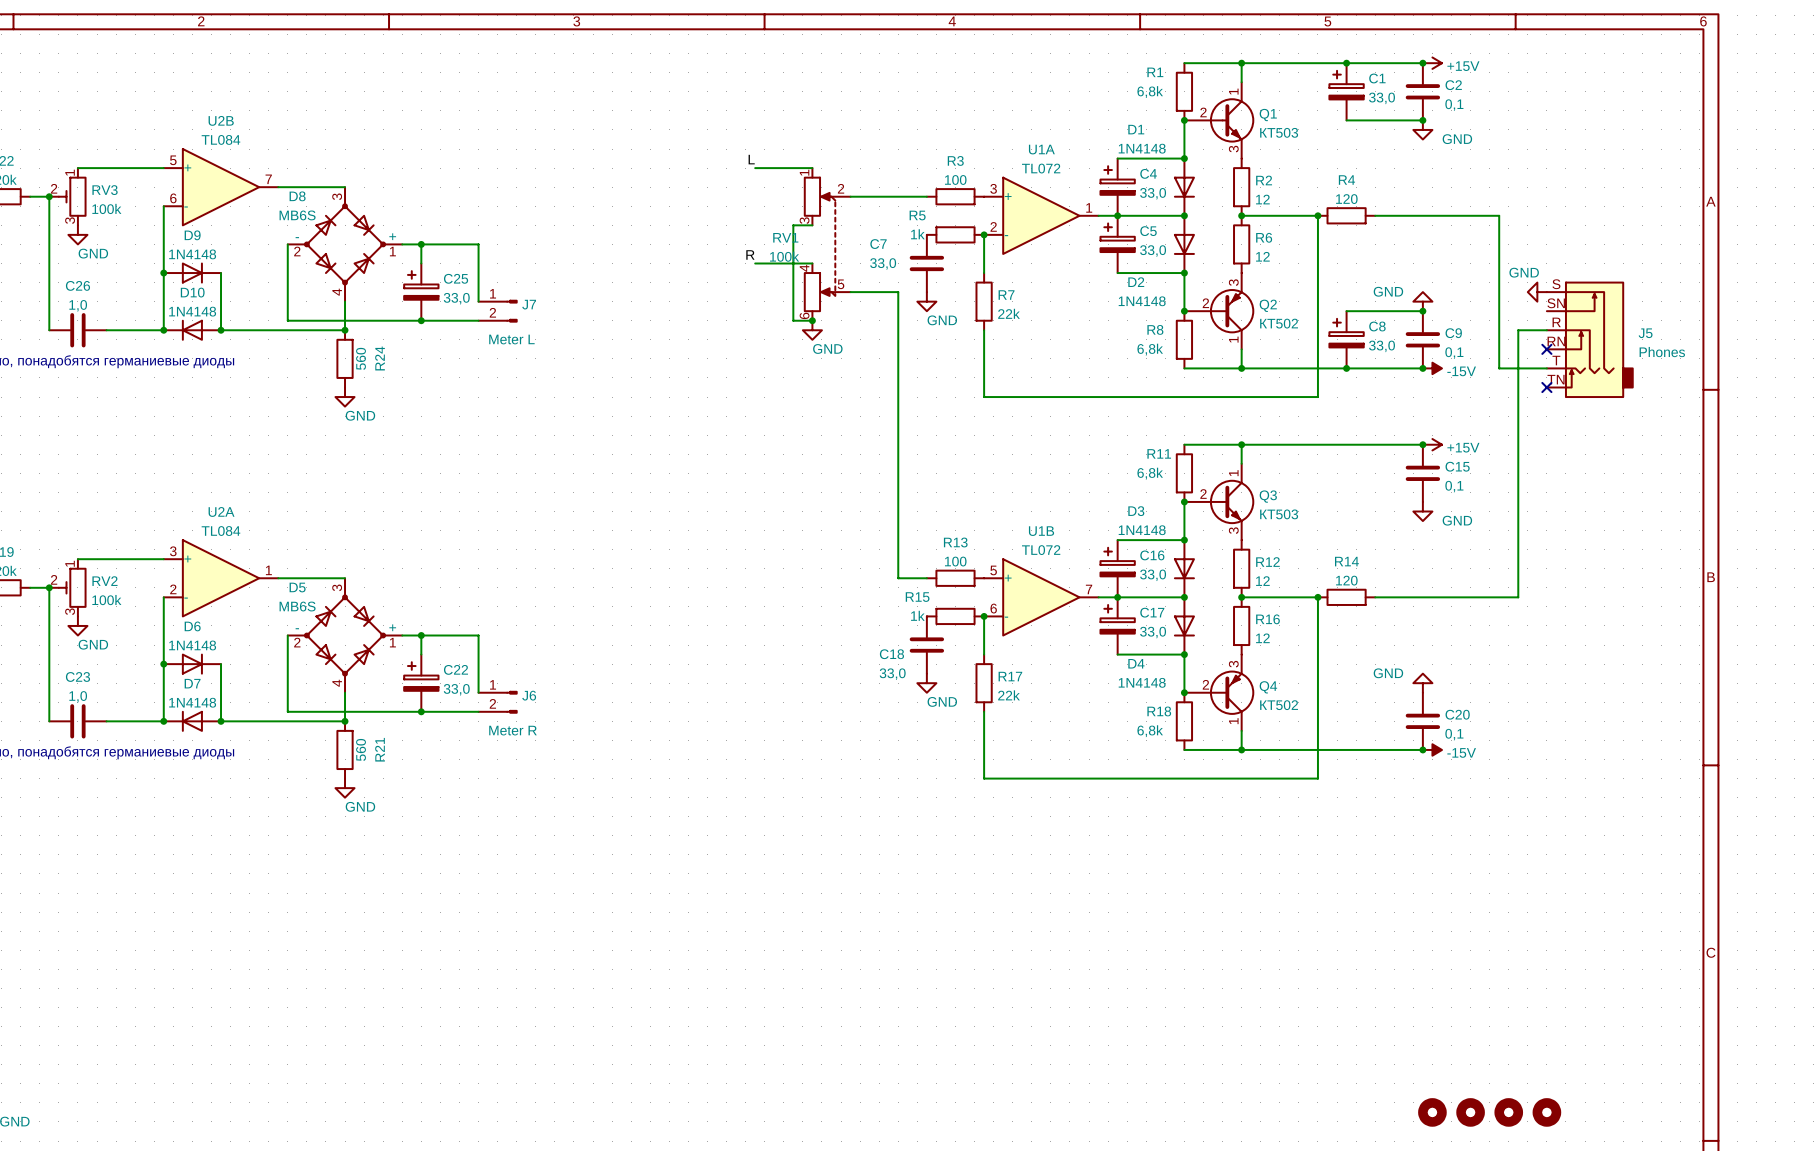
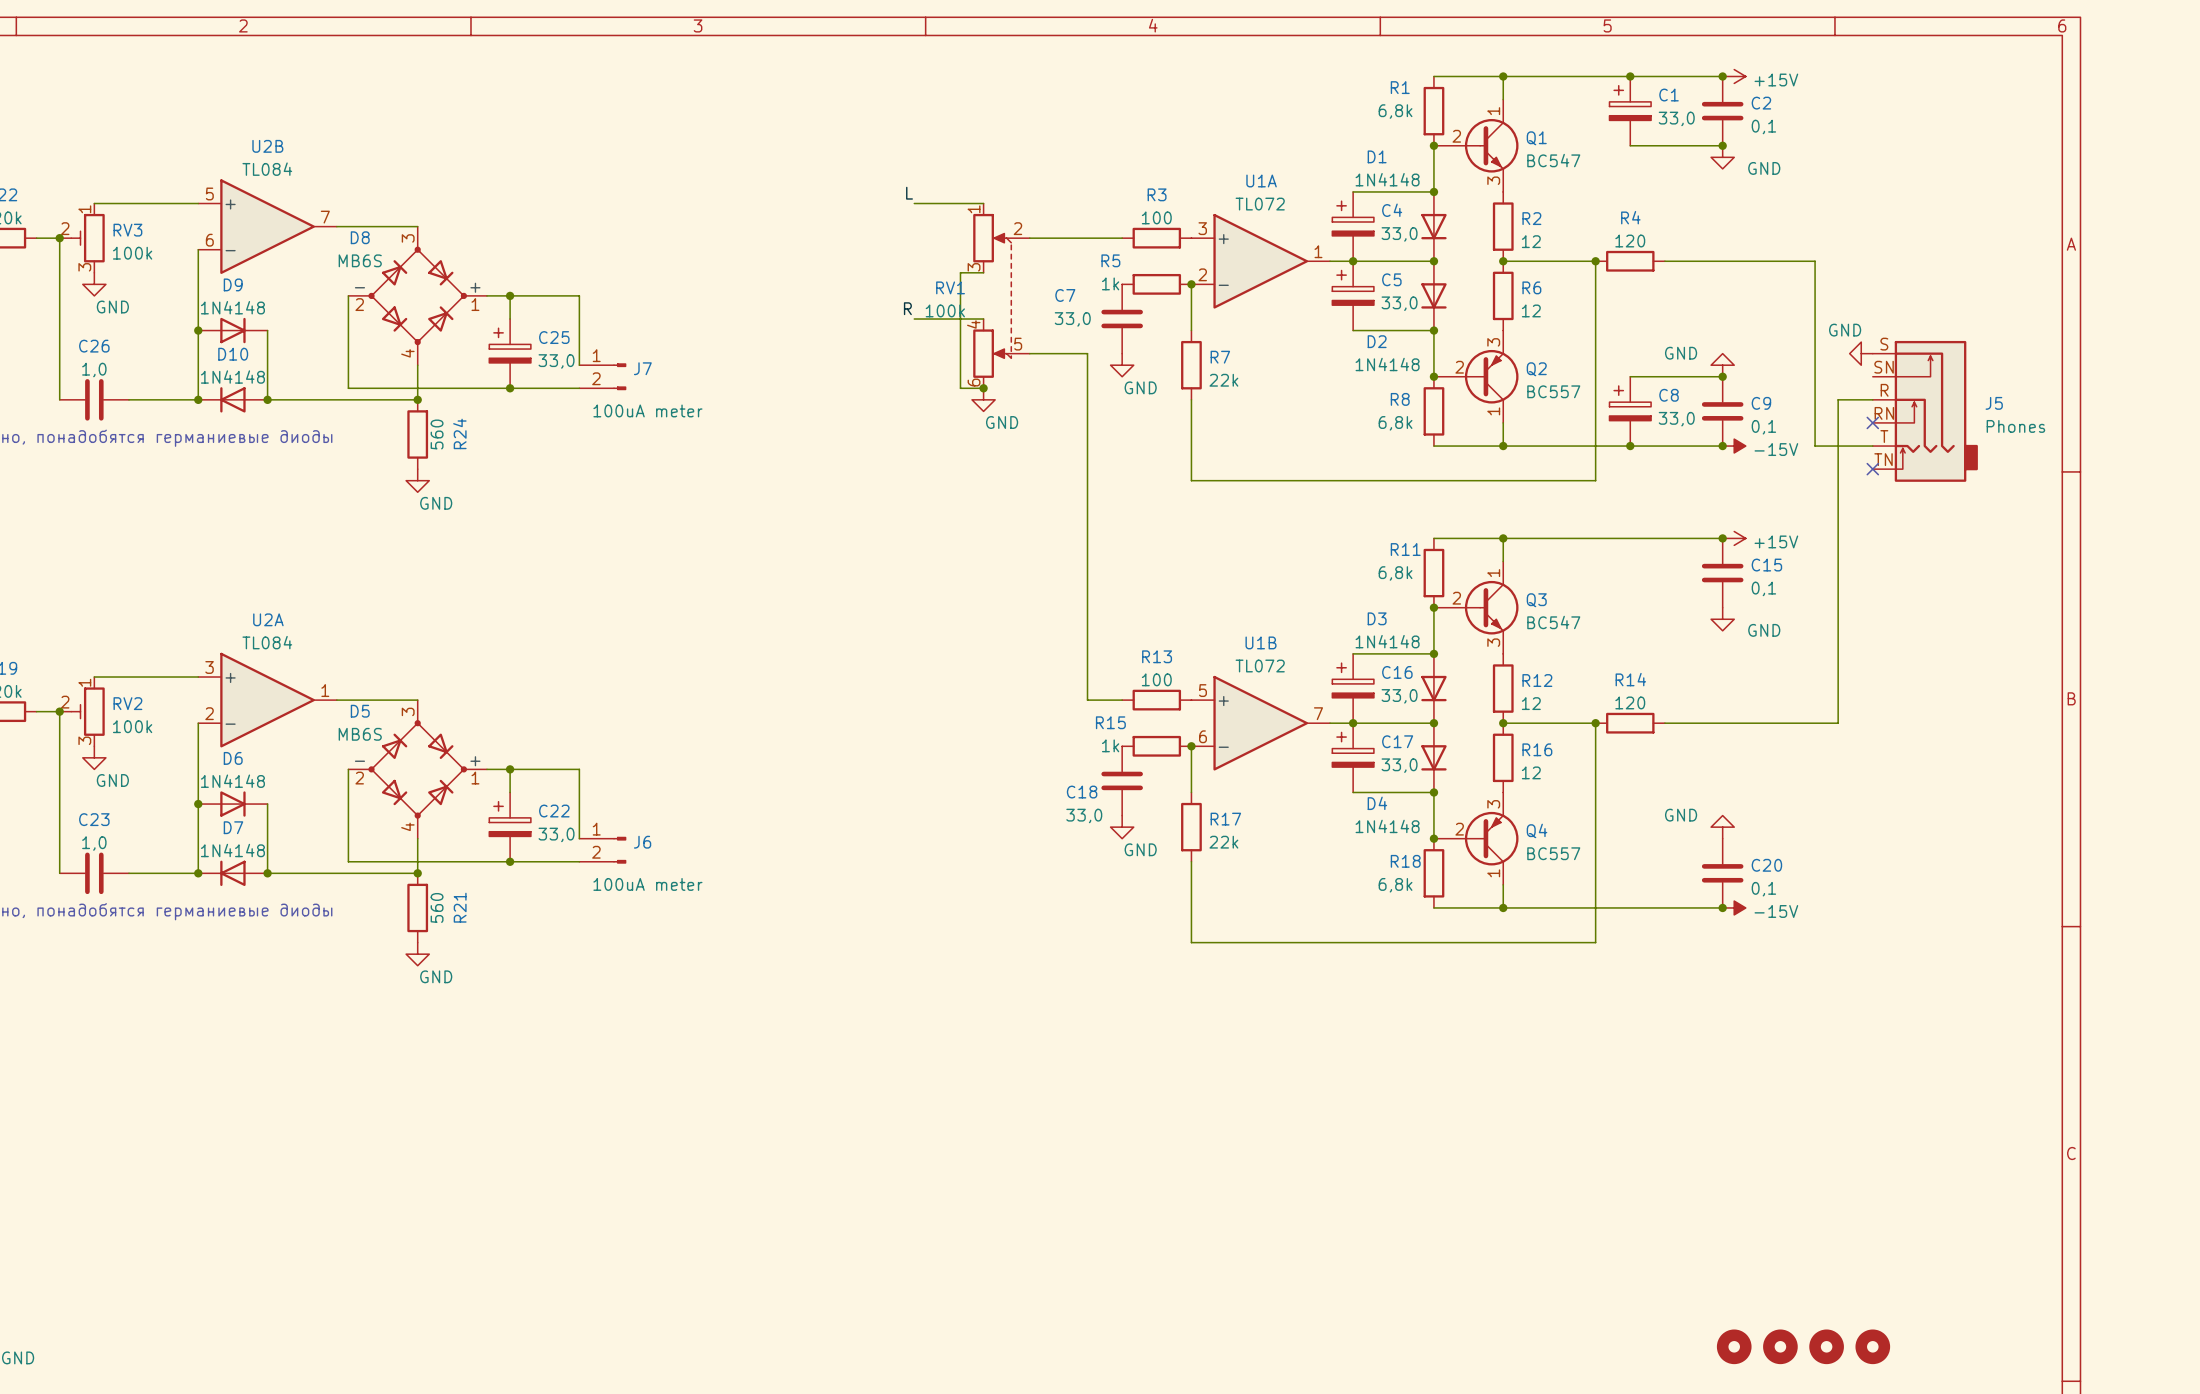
Q1 value: КТ503 (1279, 132) -> BC547 (1553, 160)
Q2 value: КТ502 (1279, 323) -> BC557 (1553, 391)
J7 value: Meter L (511, 339) -> 100uA meter (647, 410)
Q3 value: КТ503 (1279, 514) -> BC547 (1553, 622)
Q4 value: КТ502 (1279, 705) -> BC557 (1553, 853)
J6 value: Meter R (512, 730) -> 100uA meter (647, 884)

